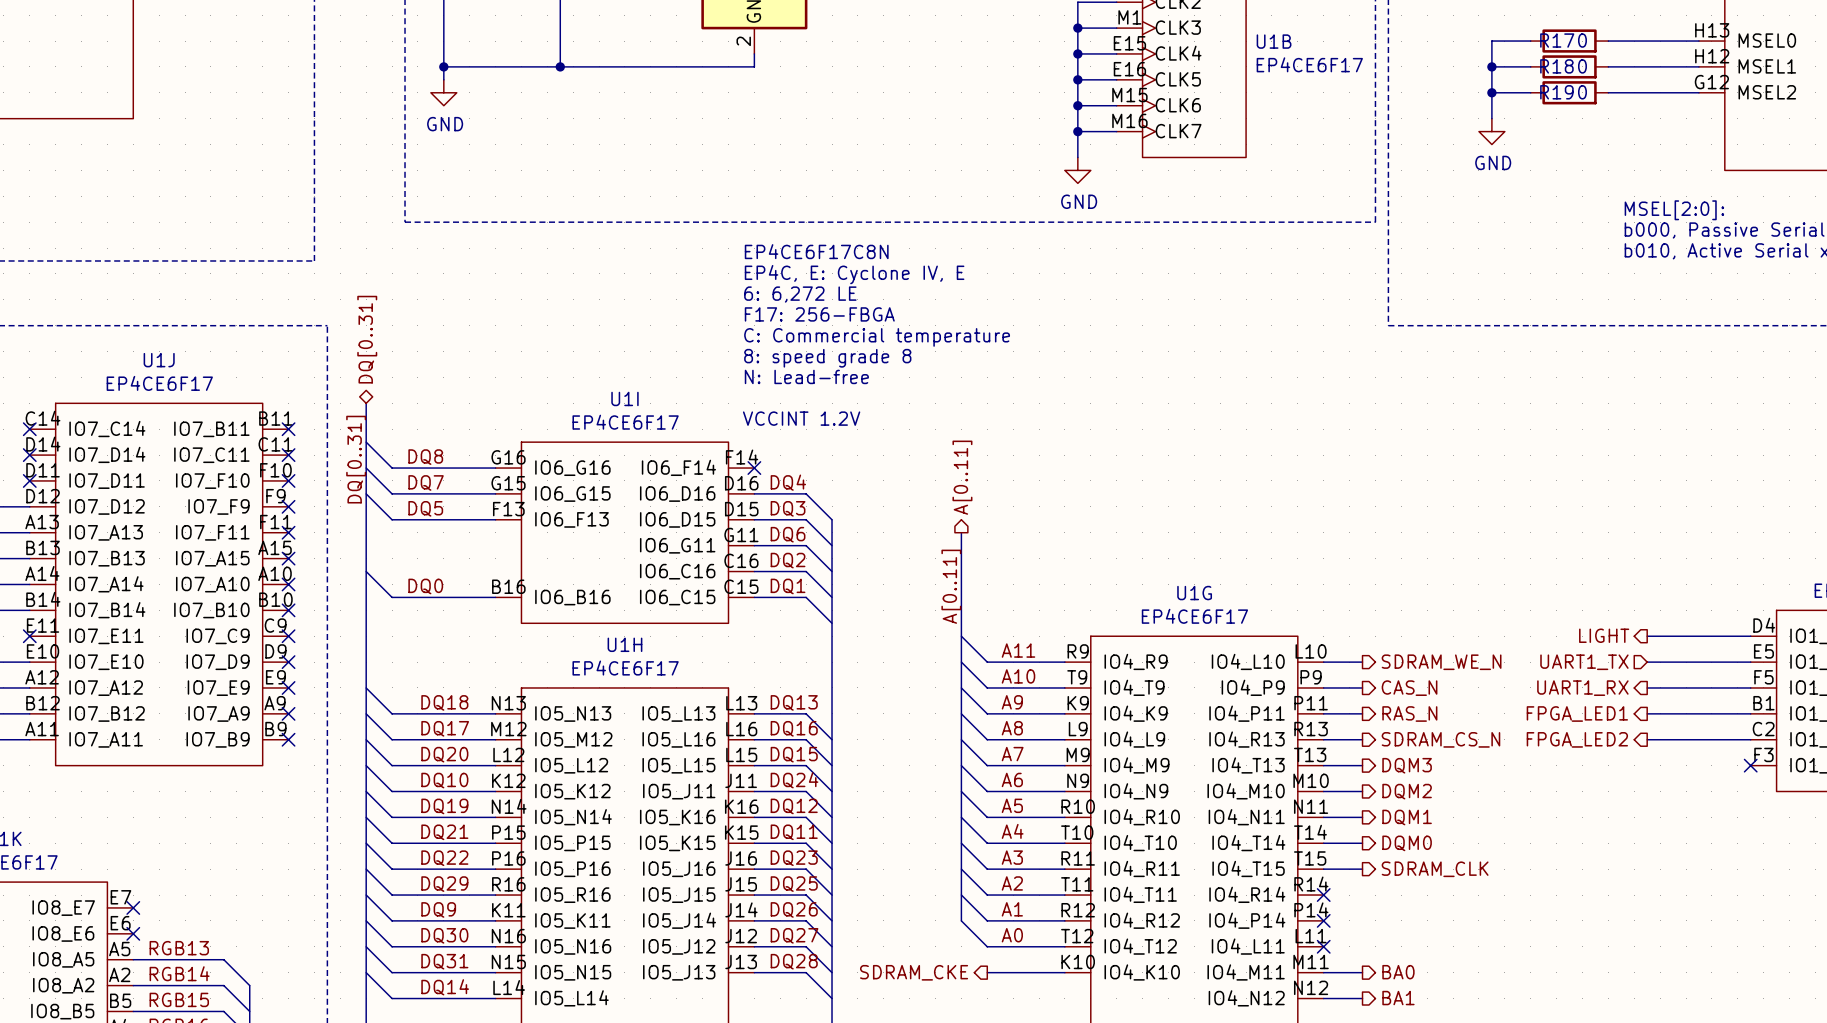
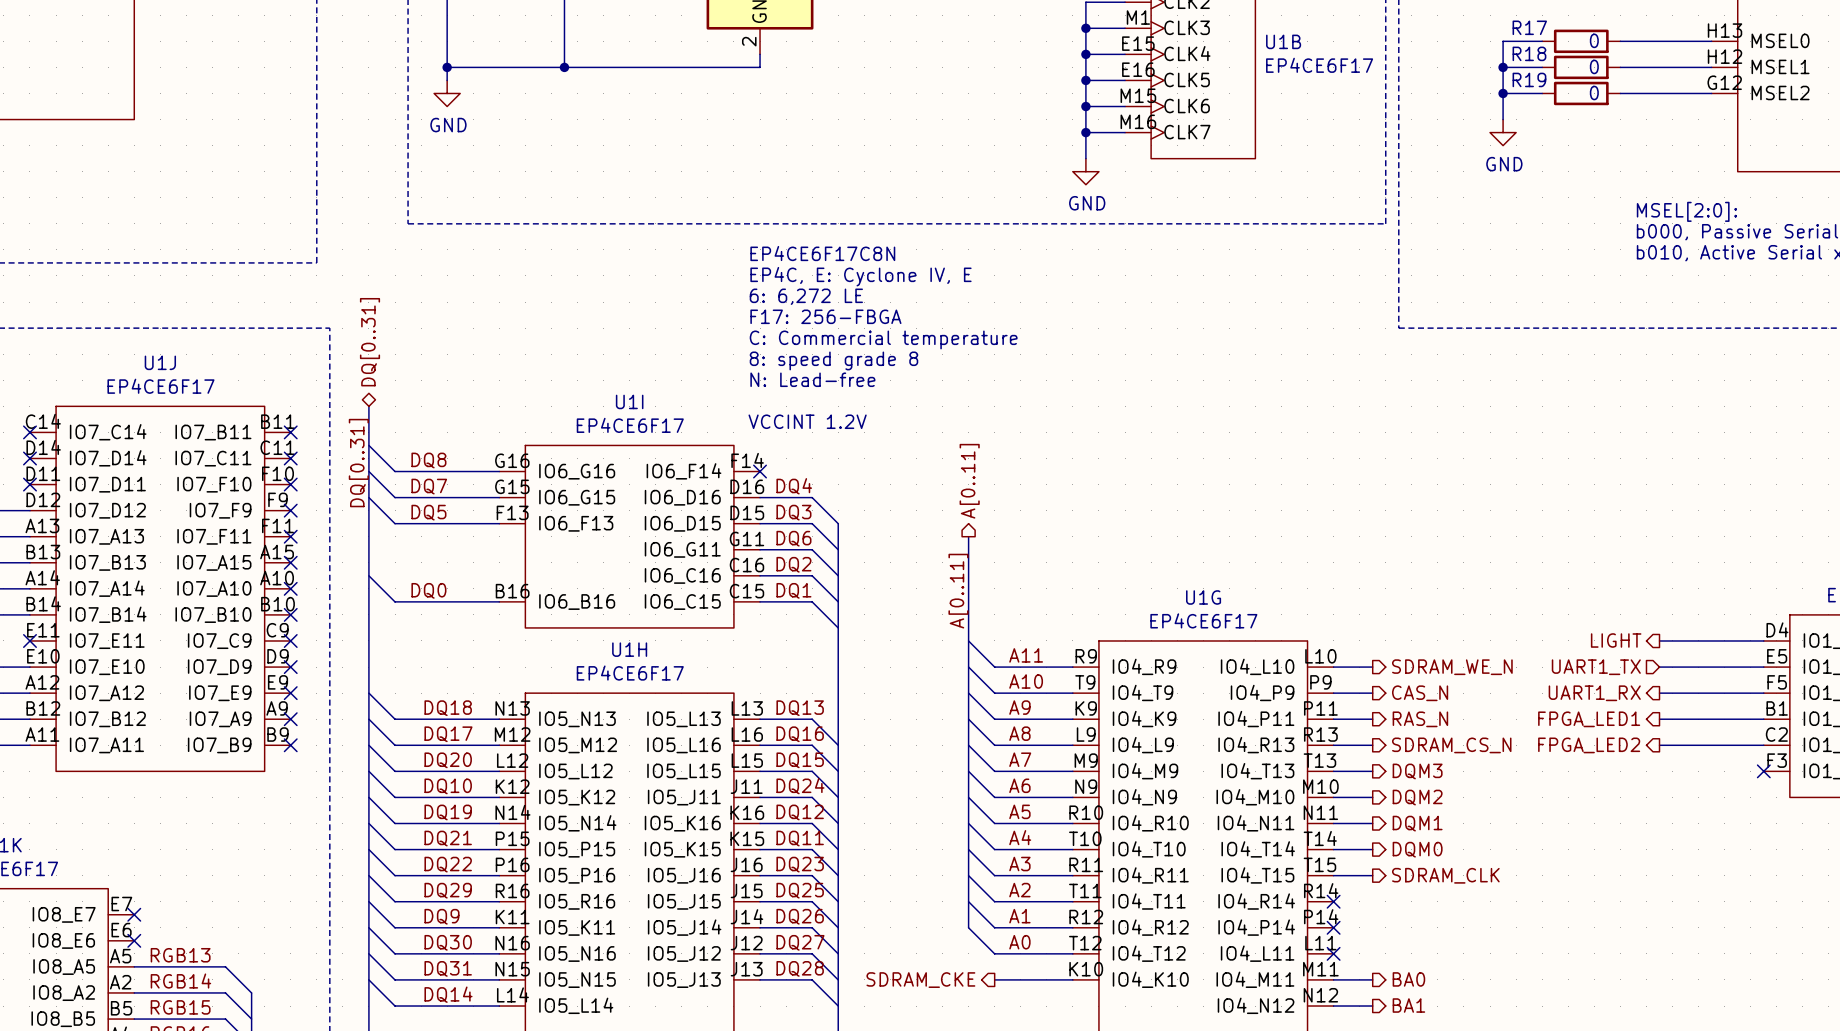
R17 name position: R17 (1557, 40) -> R17 (1529, 27)
R18 name position: R18 (1556, 66) -> R18 (1529, 53)
R19 name position: R19 (1556, 92) -> R19 (1529, 79)

